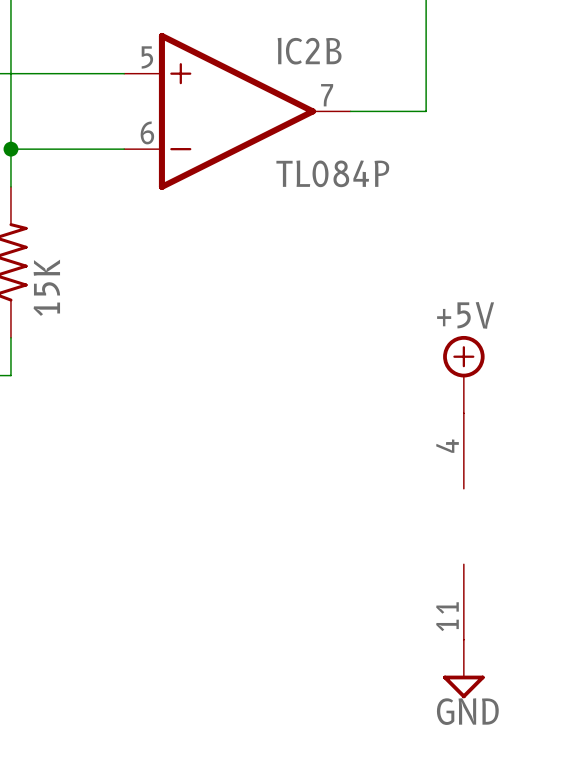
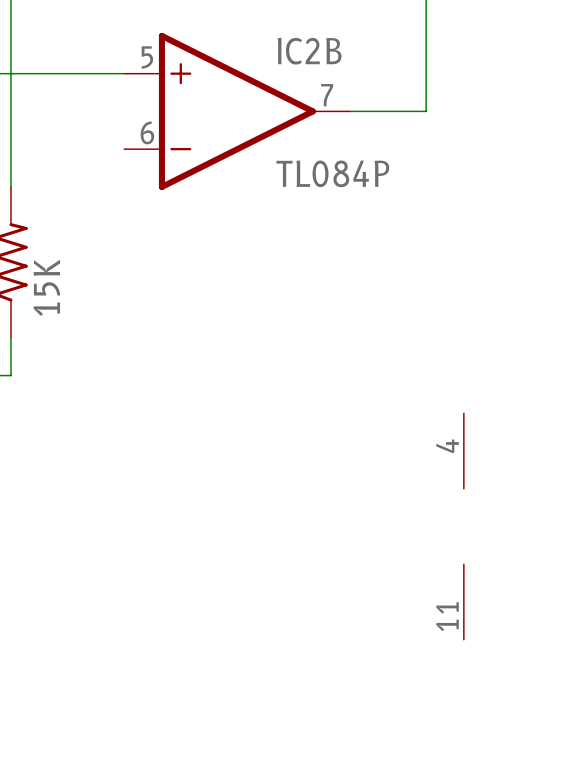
wire: (10, 149) (124, 149) -> none
junction: (10, 149) -> none
power symbol: +5V (463, 374) -> none
power symbol: GND (463, 669) -> none

